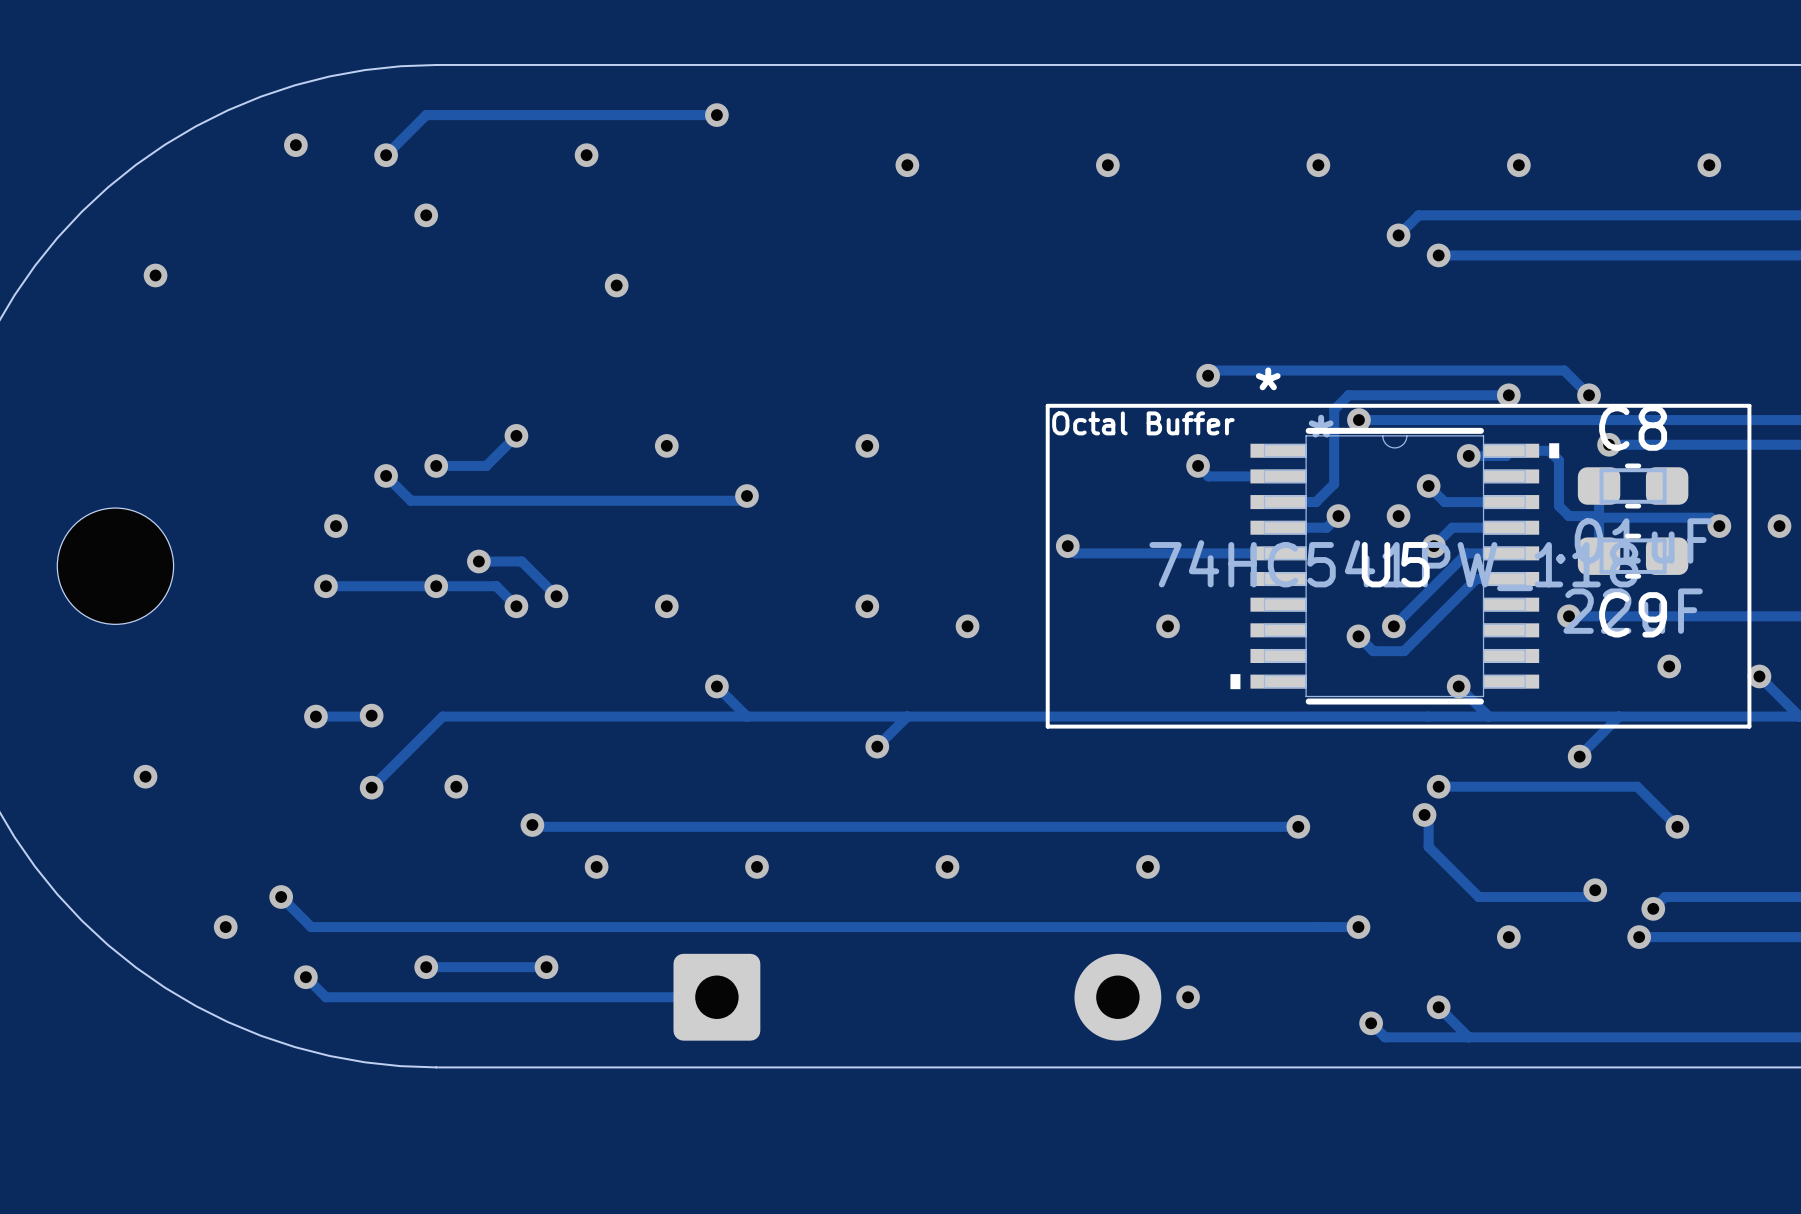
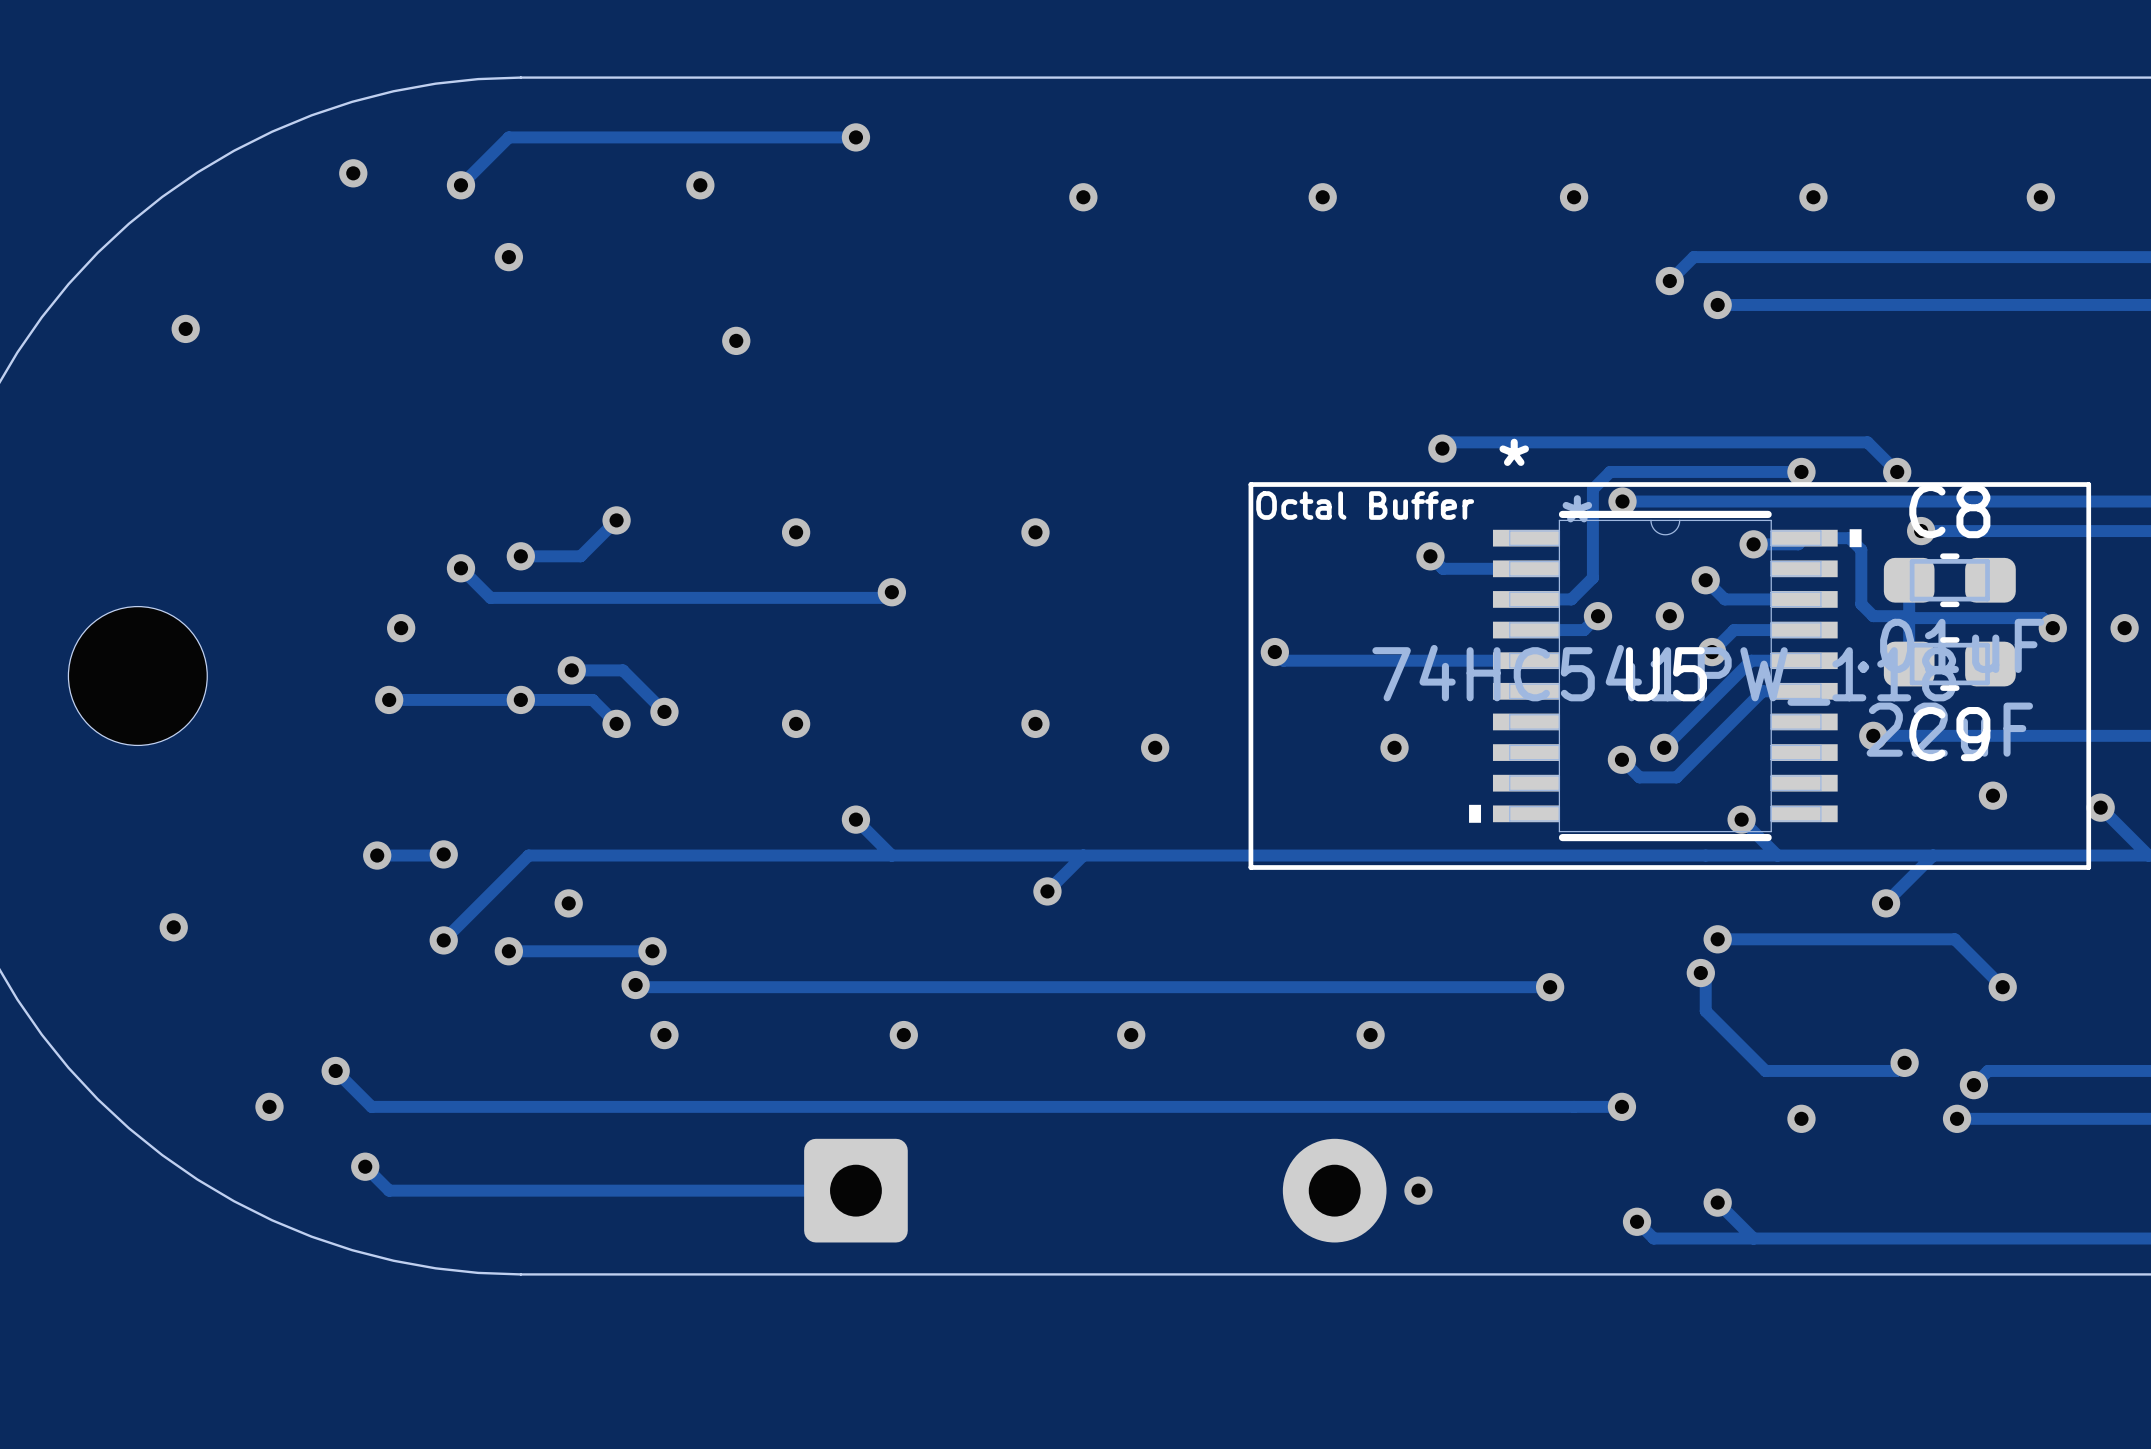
via: none -> (568, 903)
via: (456, 786) -> none
via: none -> (508, 951)
via: none -> (652, 951)
via position: (596, 866) -> (664, 1035)
via: (426, 967) -> none
track: (546, 967) (426, 967) -> (652, 951) (508, 951)
via: (546, 967) -> none

